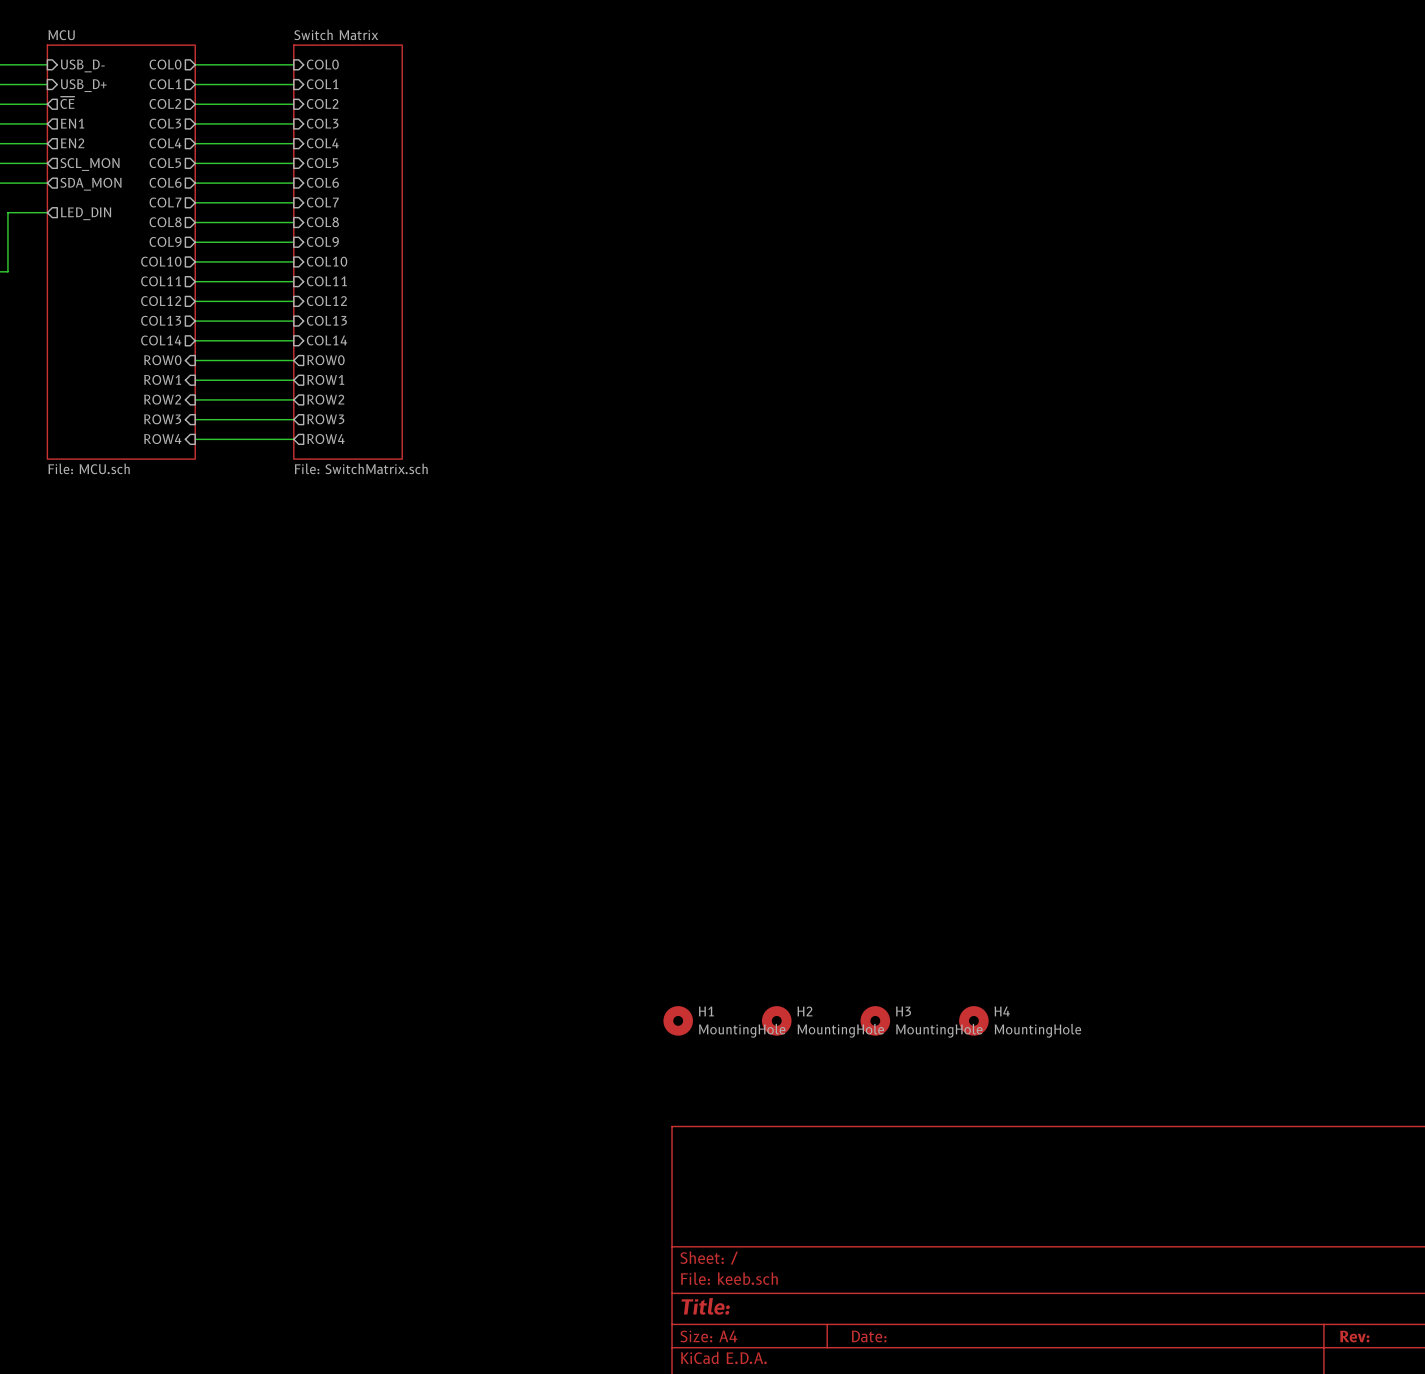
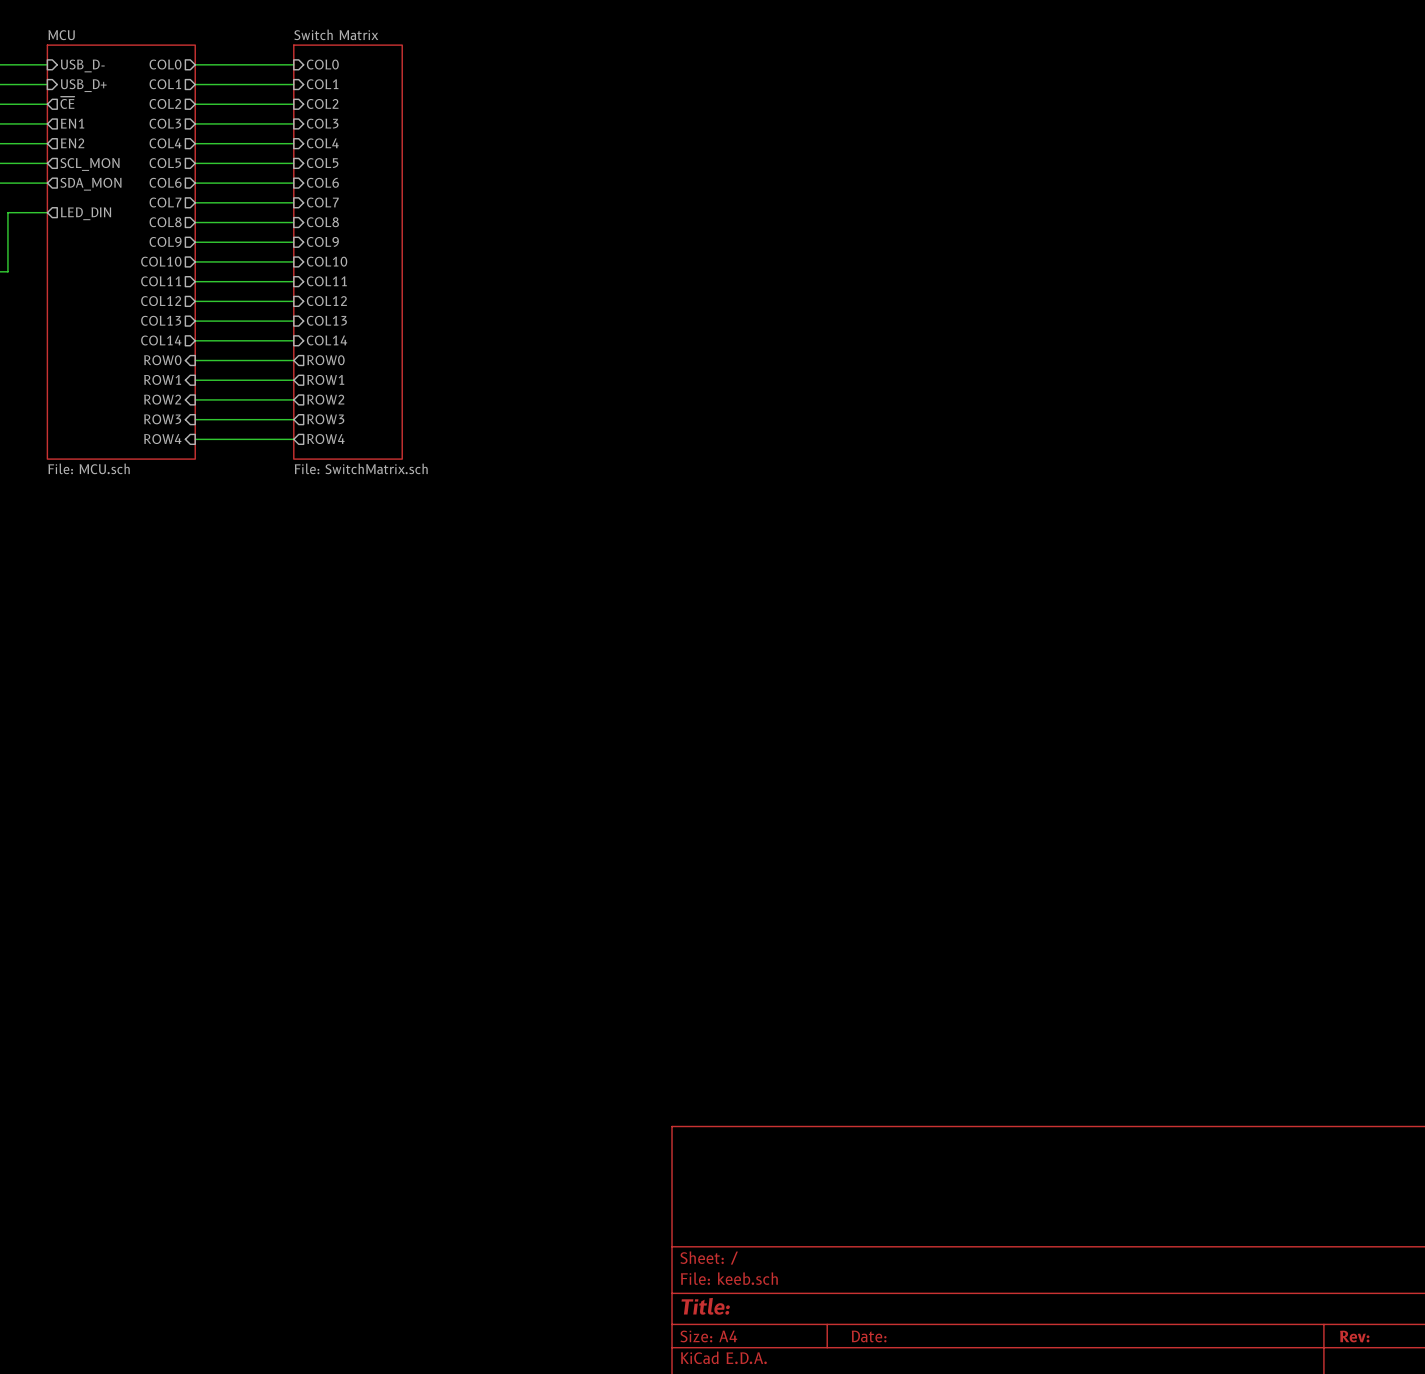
H1: MountingHole (678, 1020) -> none
H2: MountingHole (776, 1020) -> none
H3: MountingHole (875, 1020) -> none
H4: MountingHole (973, 1020) -> none

